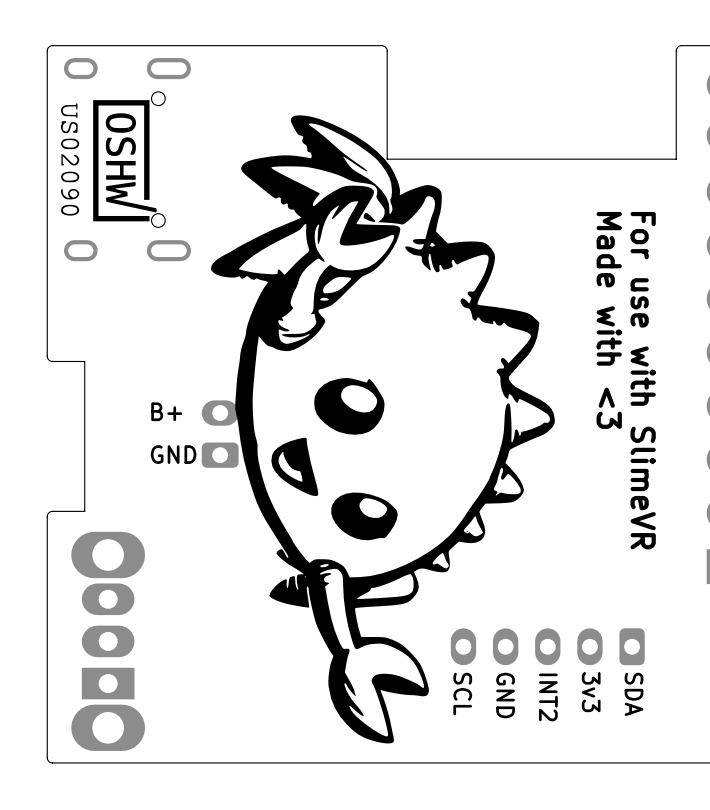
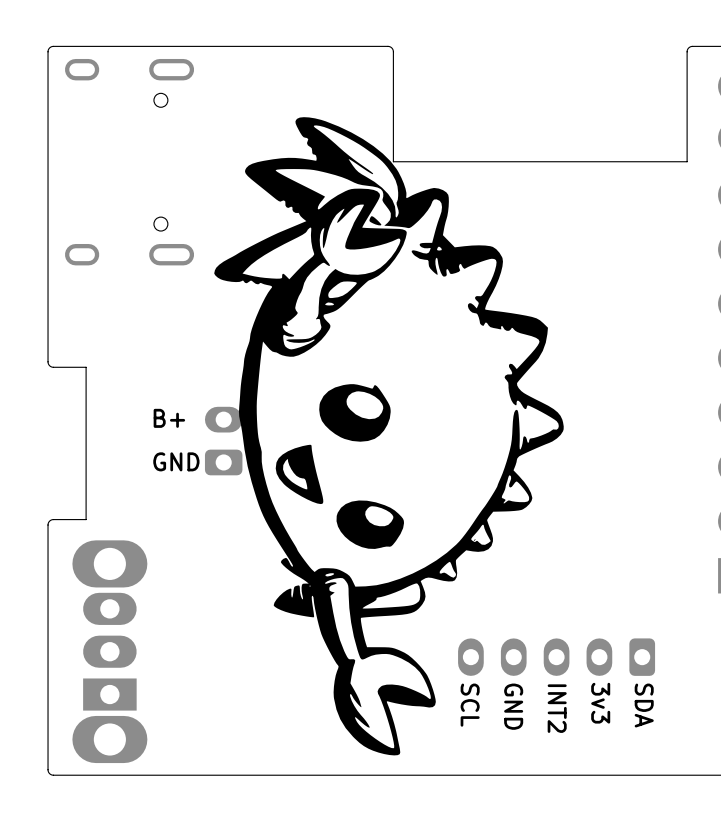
drawing: [60, 100, 157, 222] -> none
text: Made with <3 (609, 320) -> none
text: For use with SlimeVR (643, 380) -> none

